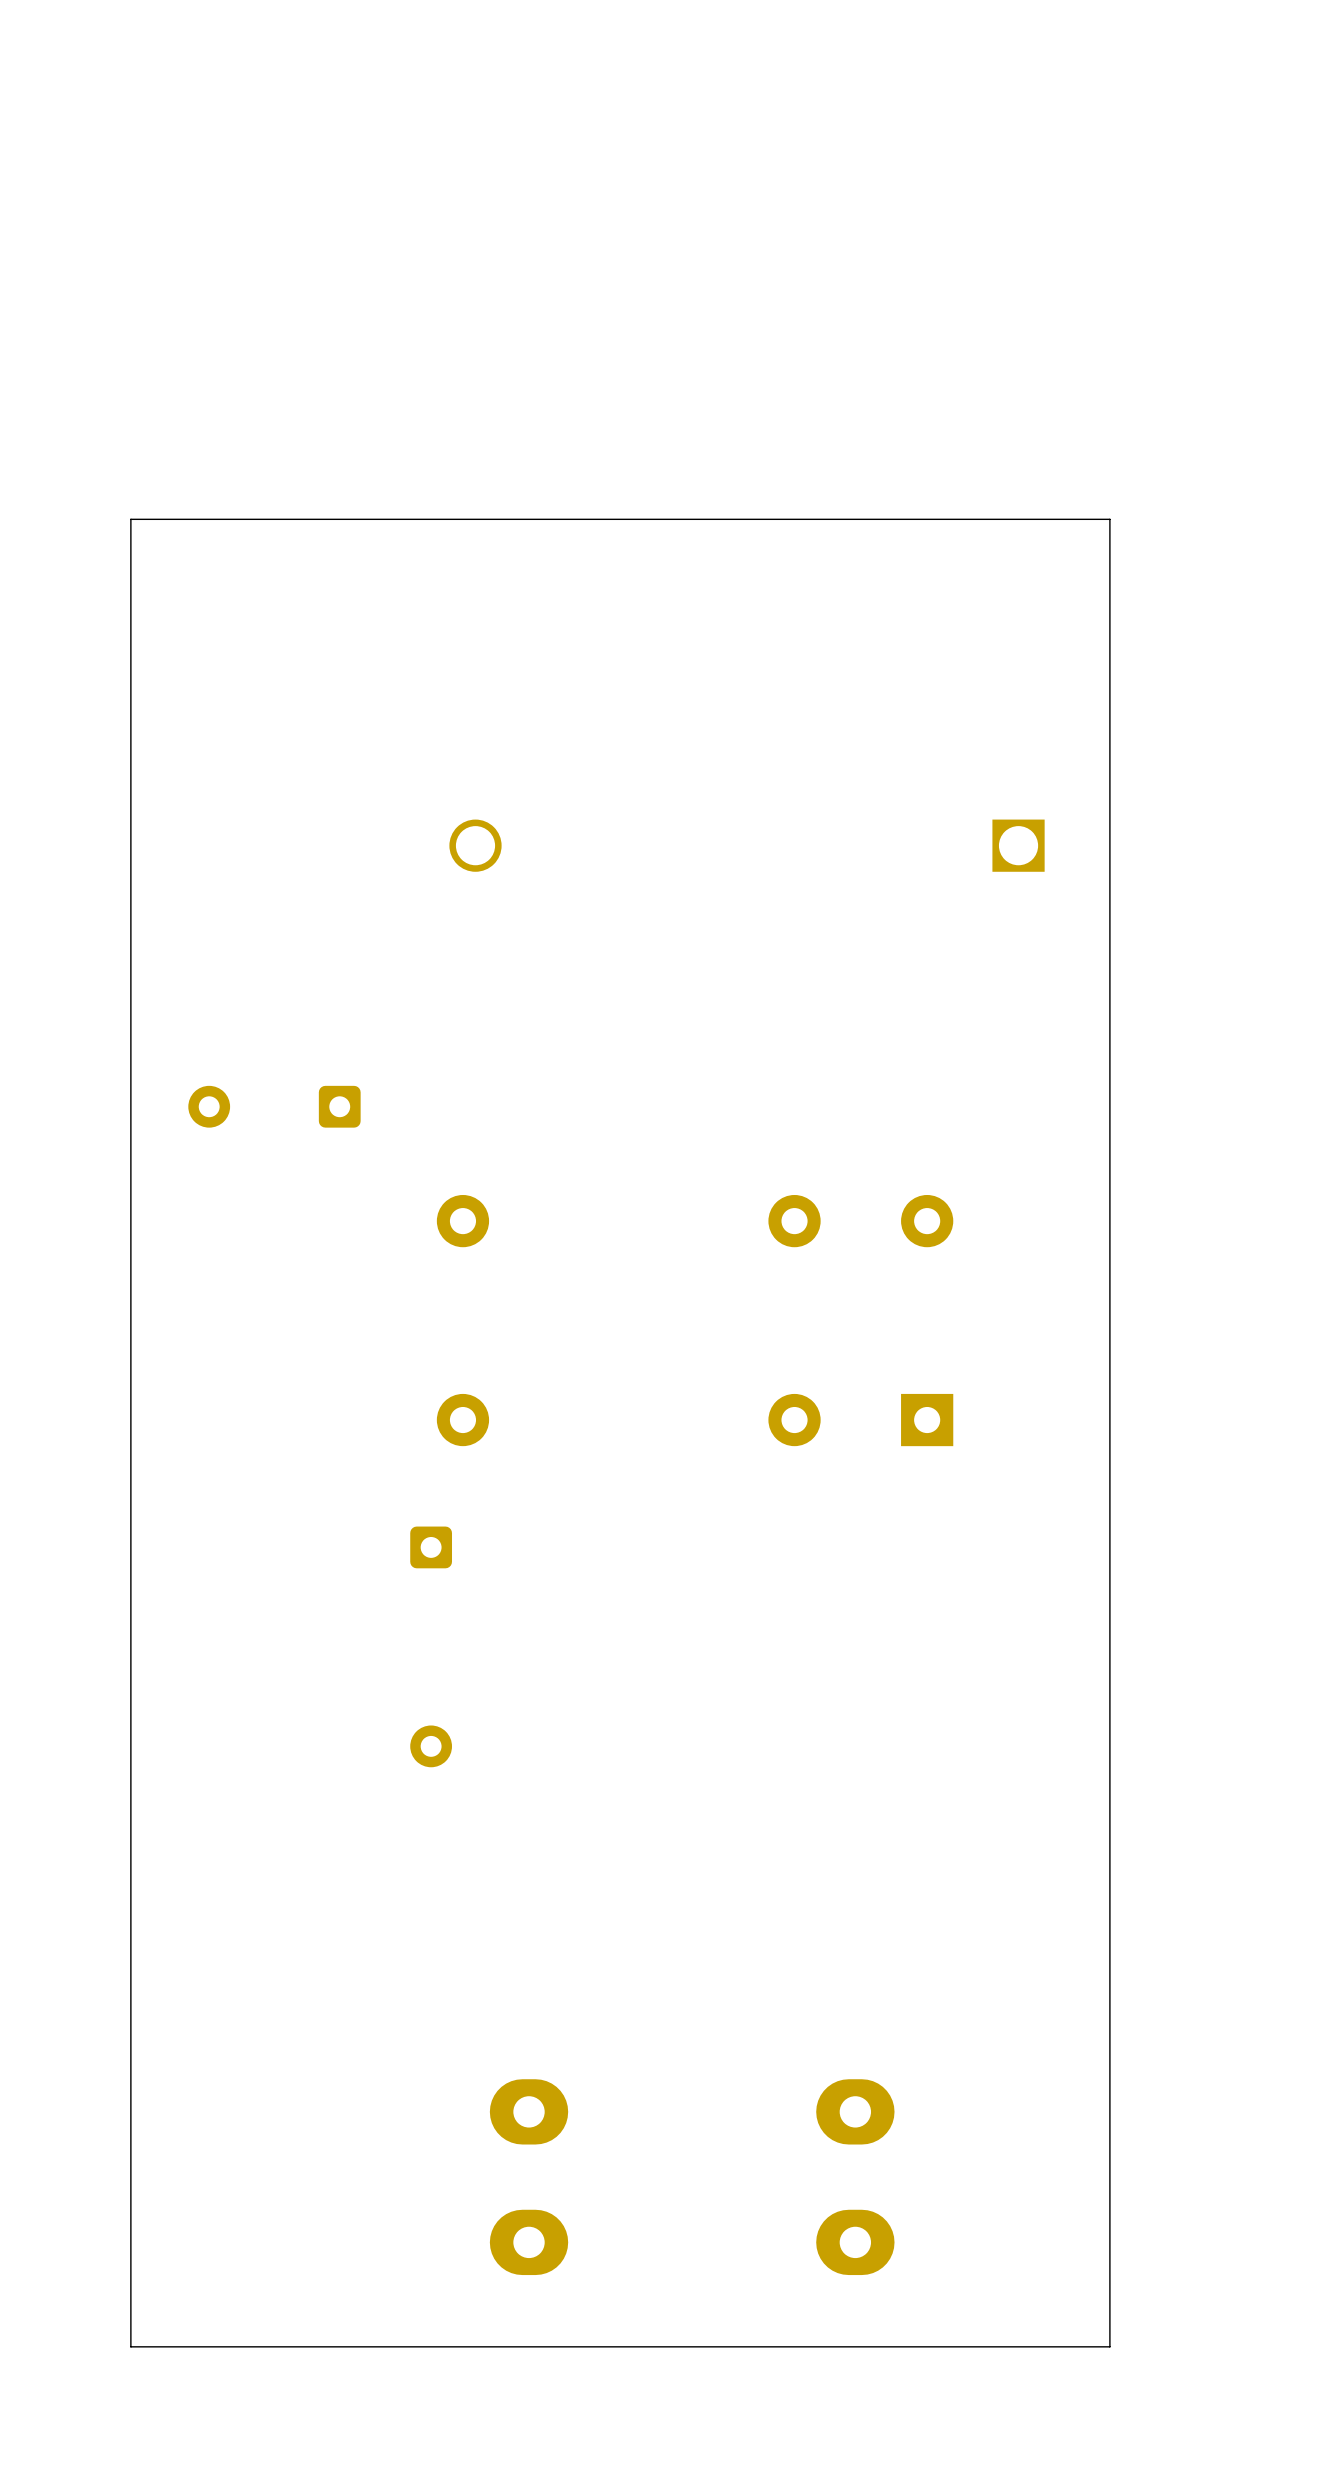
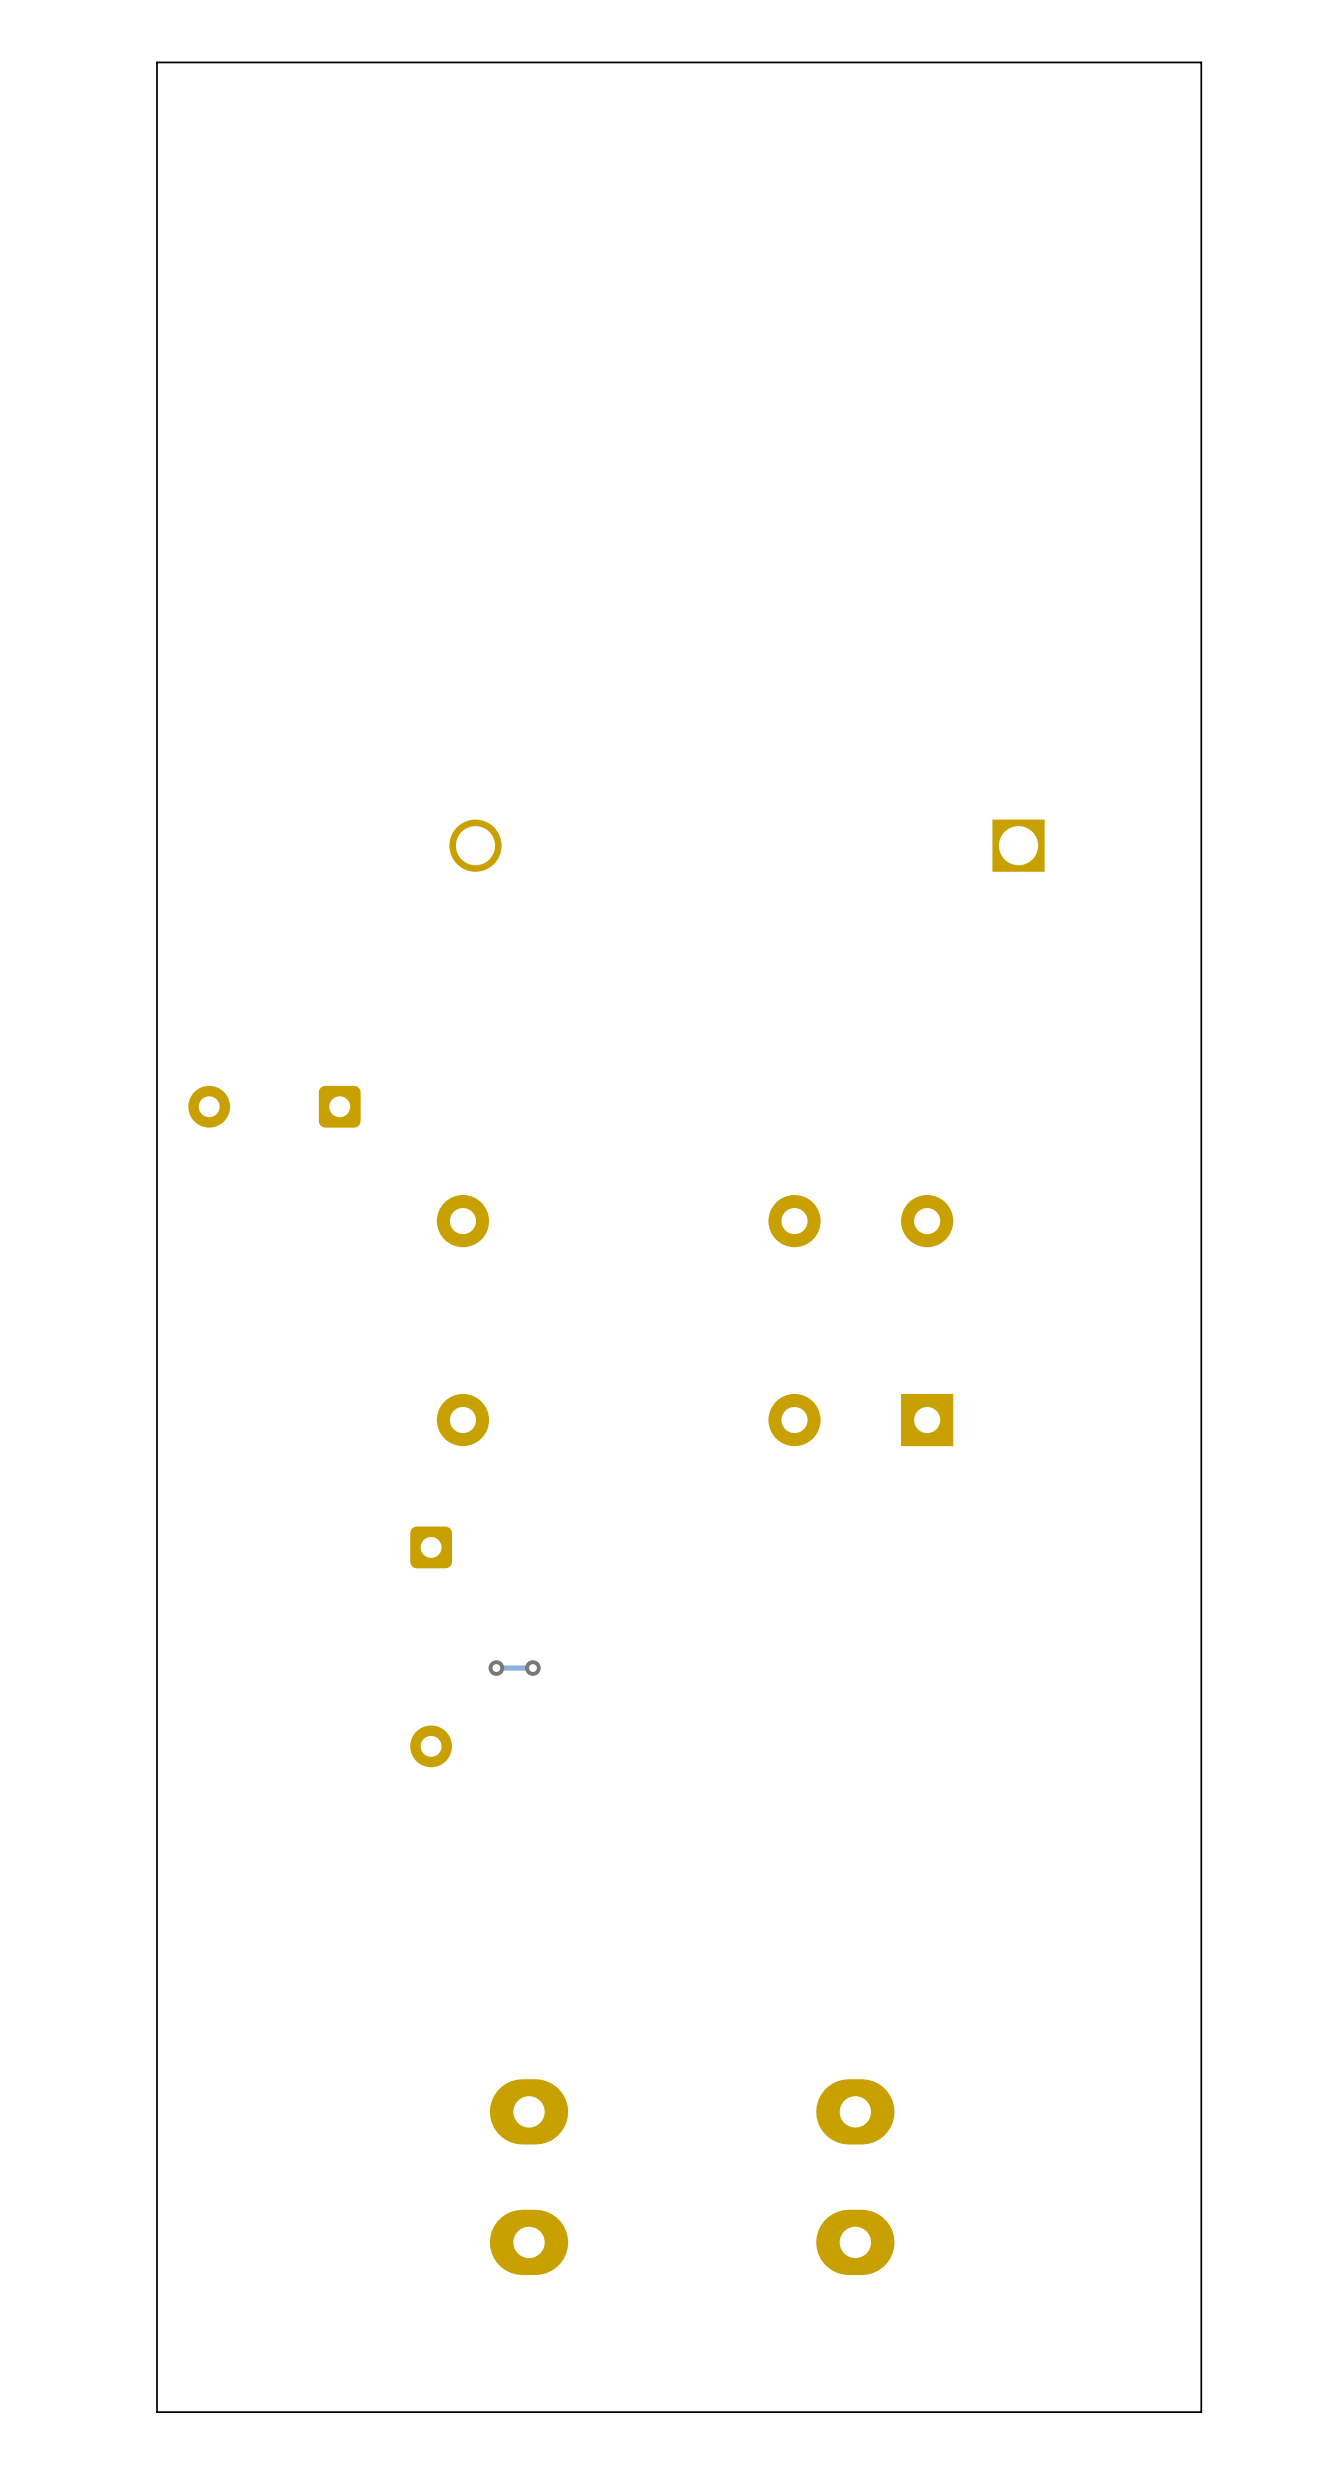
board edge: (1109, 519) (130, 519) (130, 2346) (1109, 2346) (1109, 519) -> (1201, 62) (1201, 2412) (156, 2412) (156, 62) (1201, 62)
via: none -> (496, 1668)
track: none -> (532, 1668) (496, 1668)
via: none -> (532, 1668)

